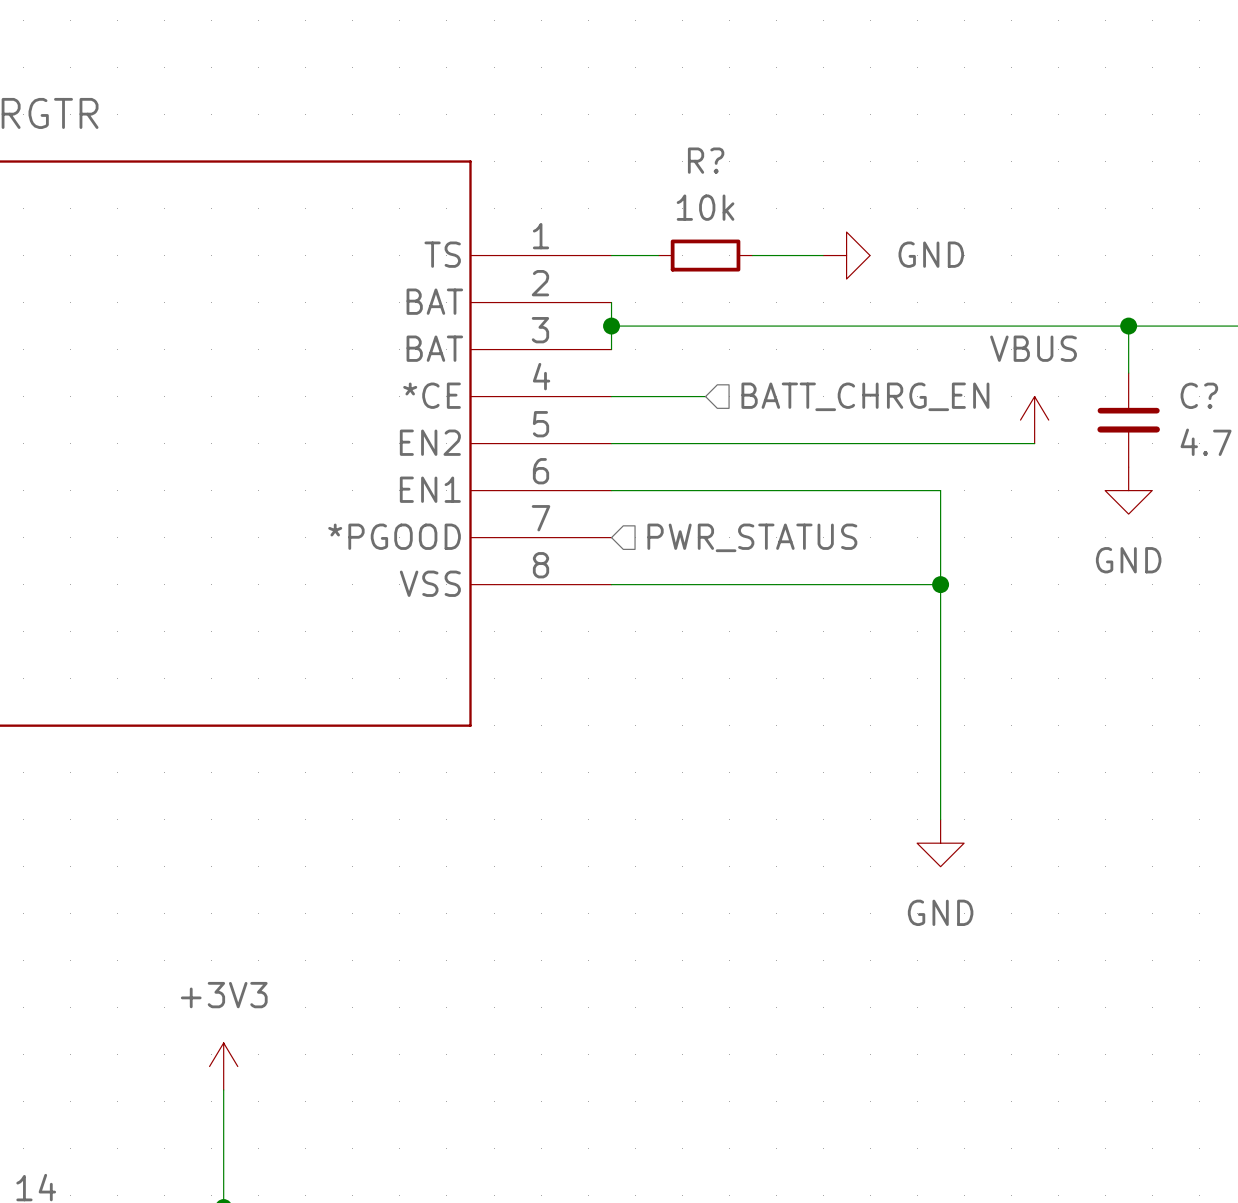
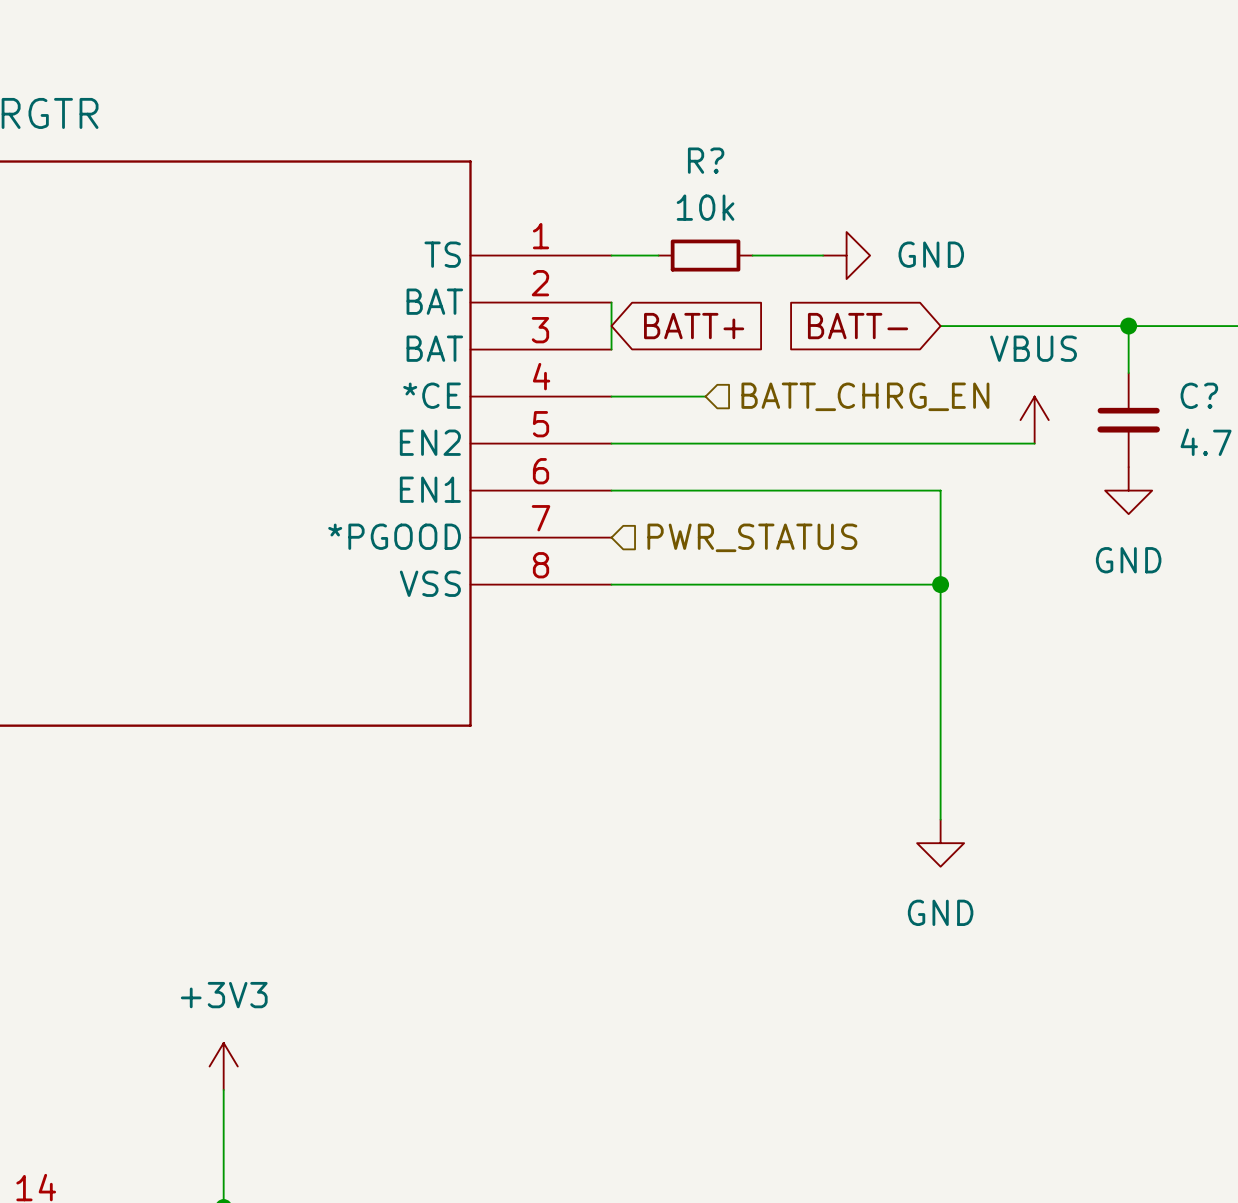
wire: (611, 326) (940, 326) -> none
junction: (611, 326) -> none
global label: none -> BATT+ (694, 326)
global label: none -> BATT- (858, 326)

